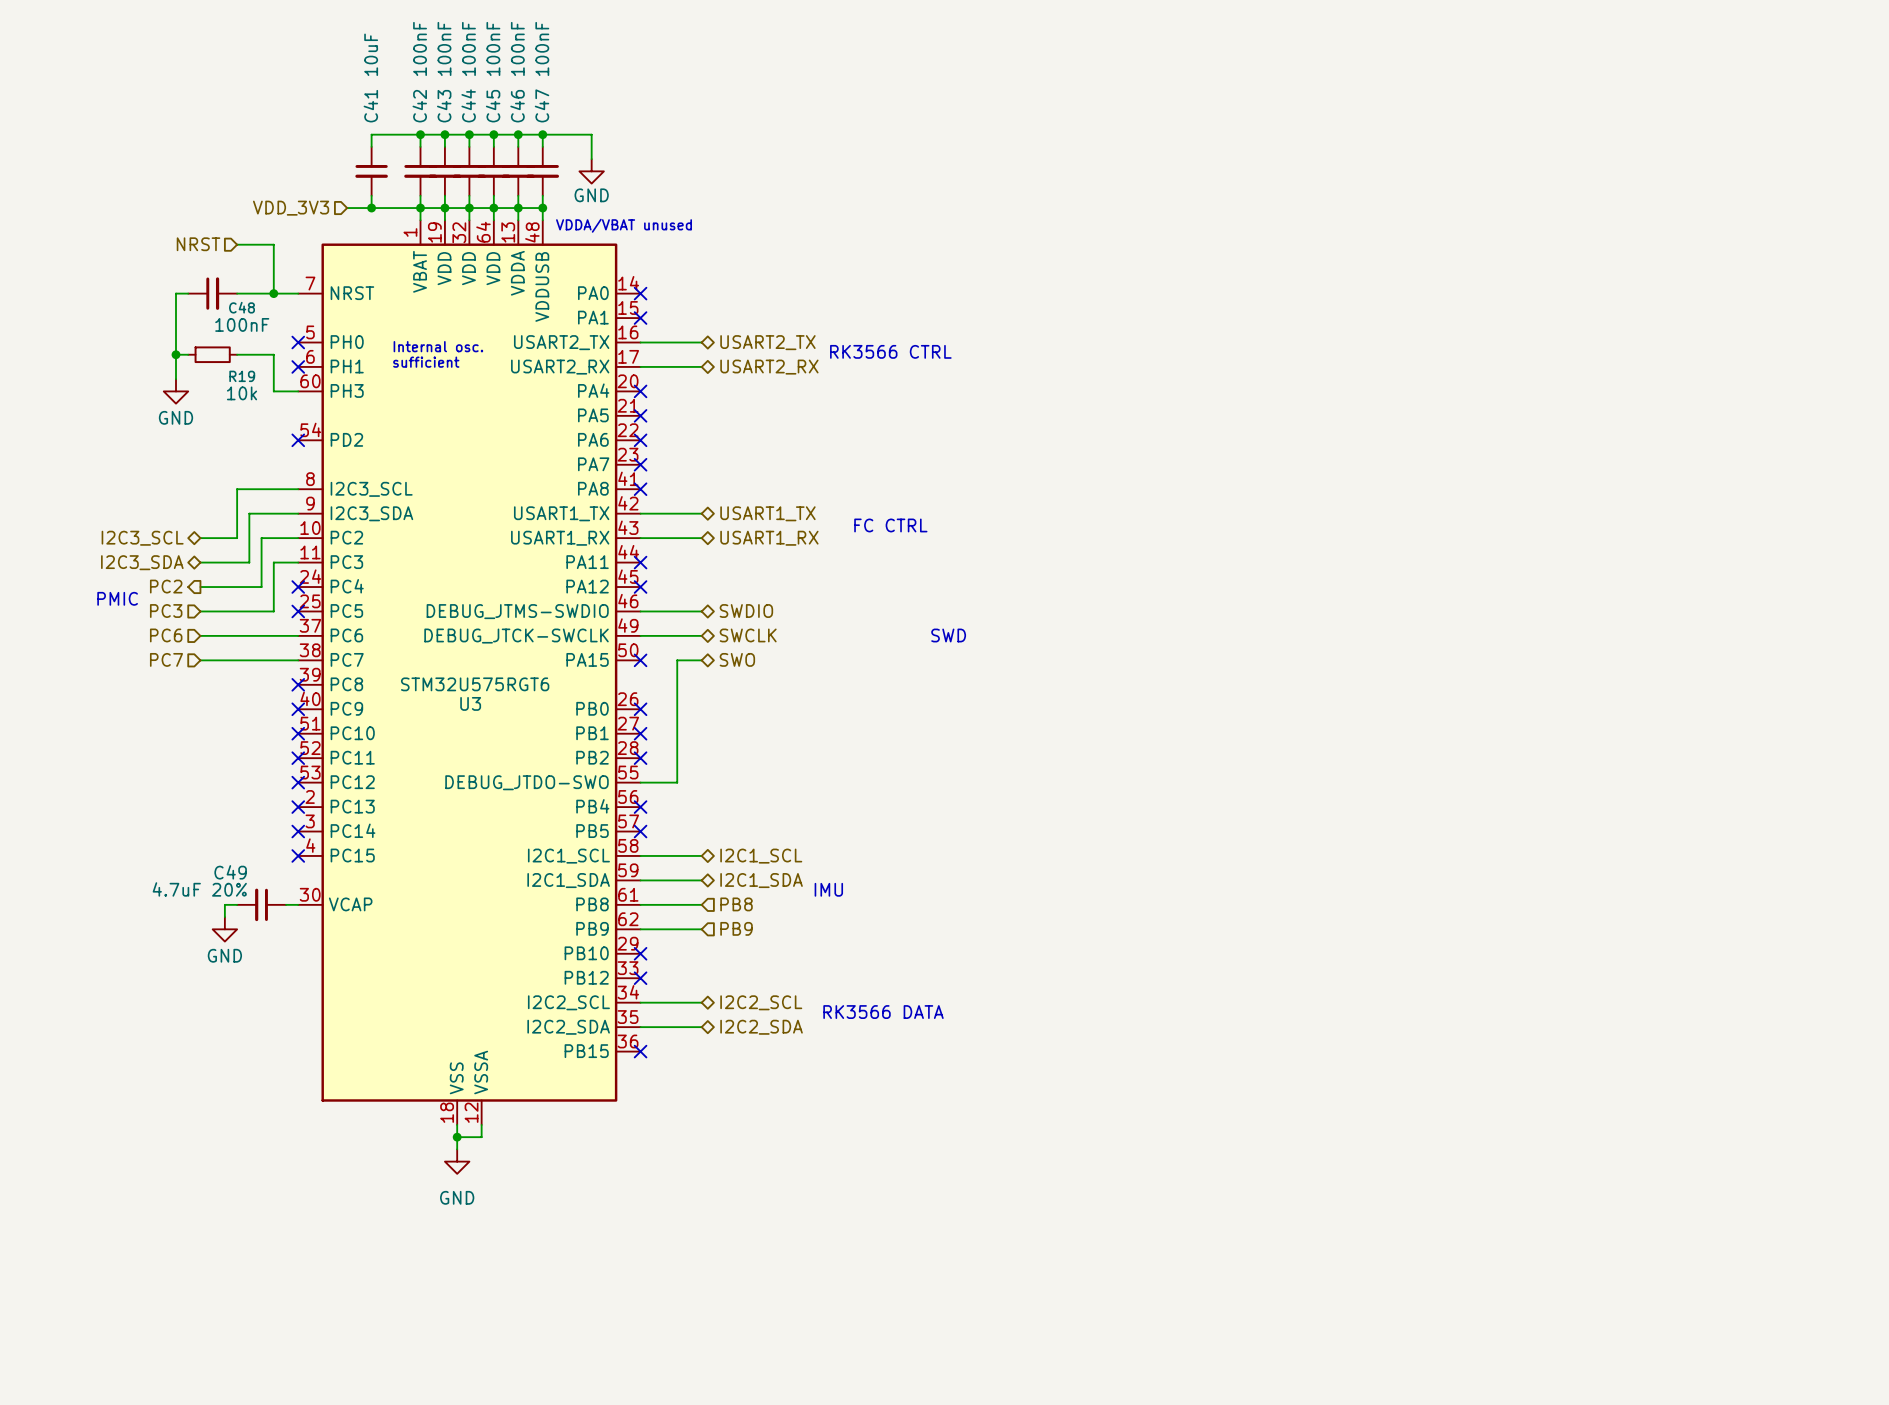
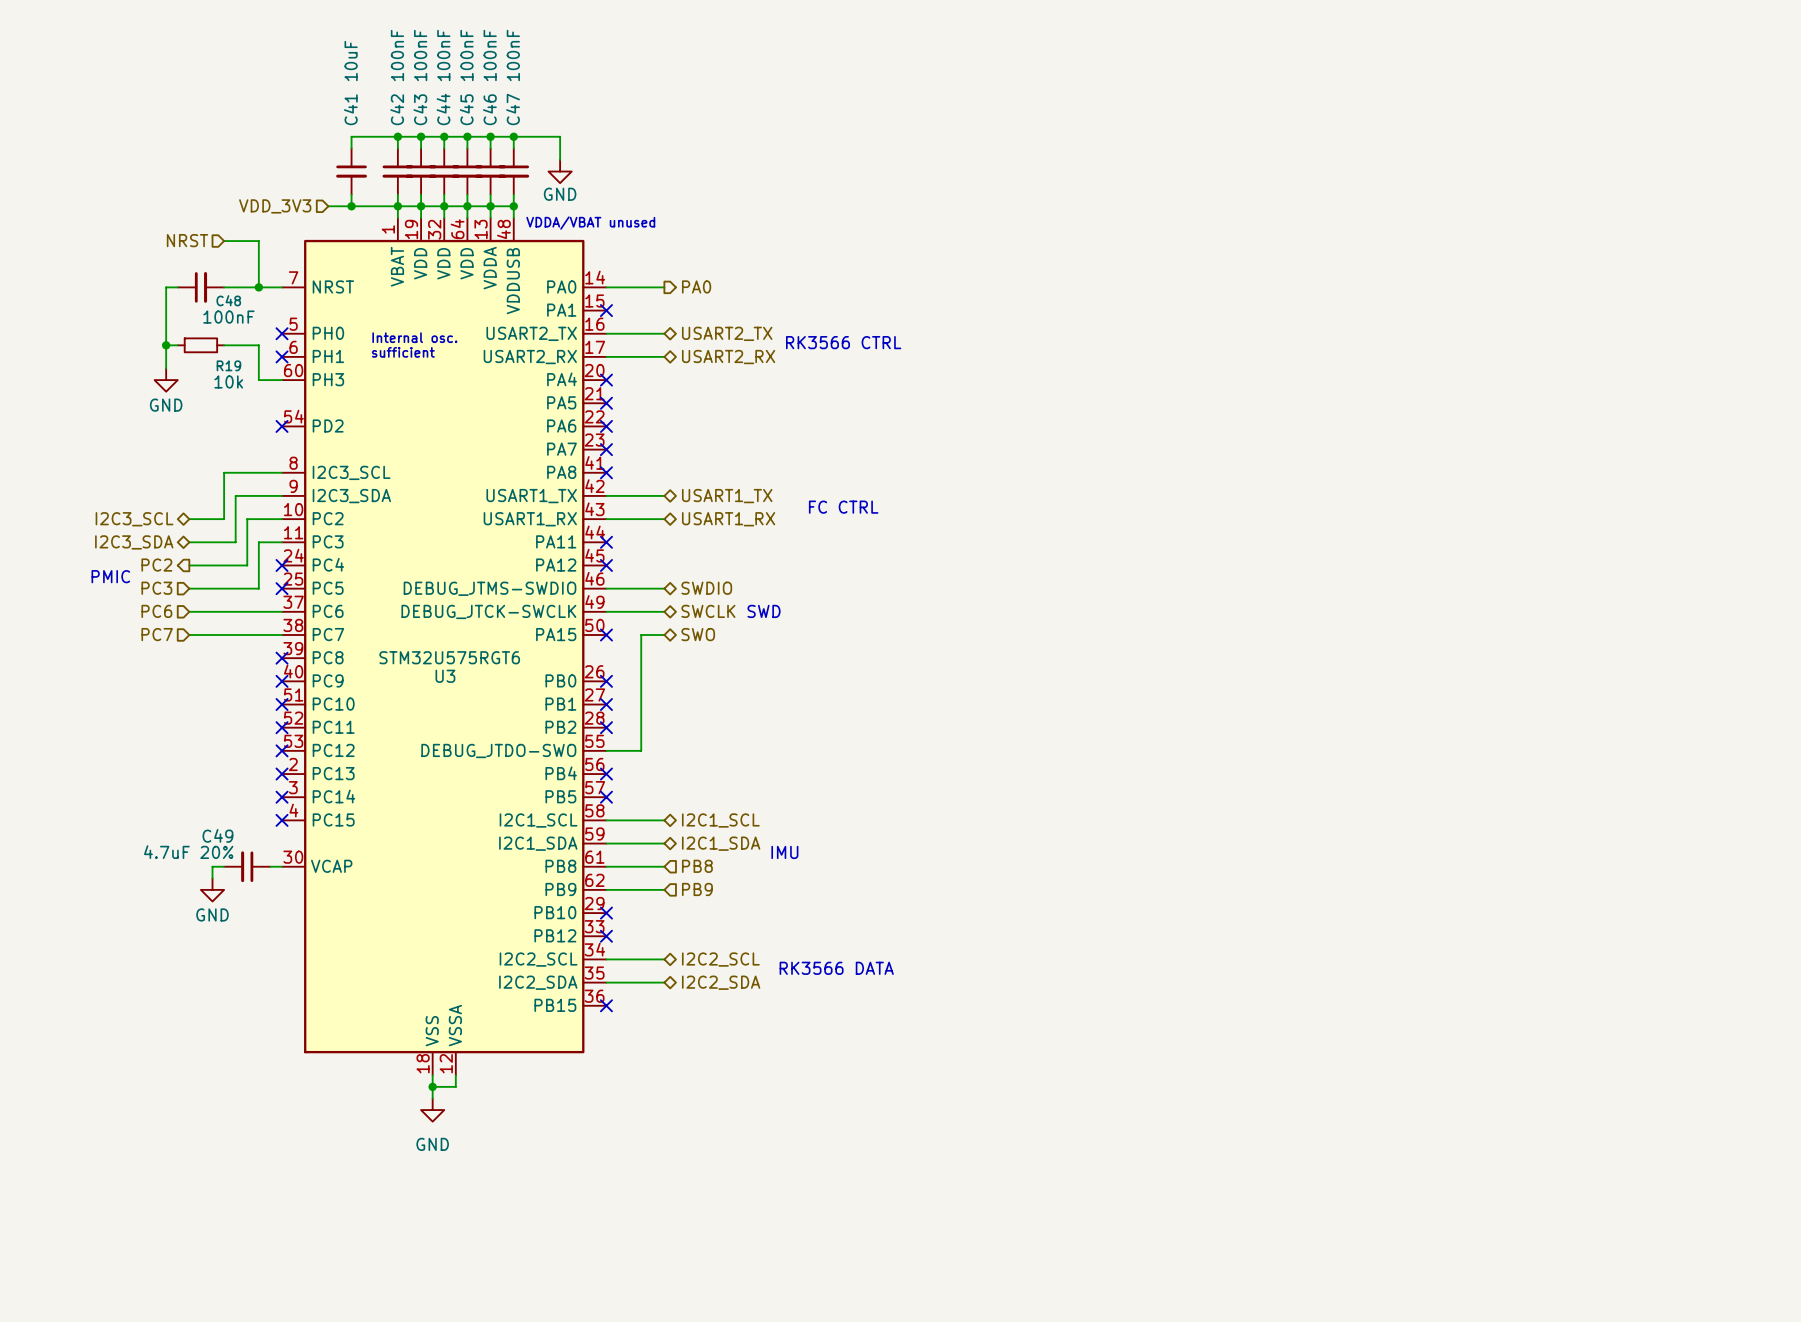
wire: none -> (606, 287) (664, 287)
no-connect mark: (640, 293) -> none
hierarchical label: none -> PA0 (696, 286)
text position: SWD (948, 635) -> SWD (764, 611)

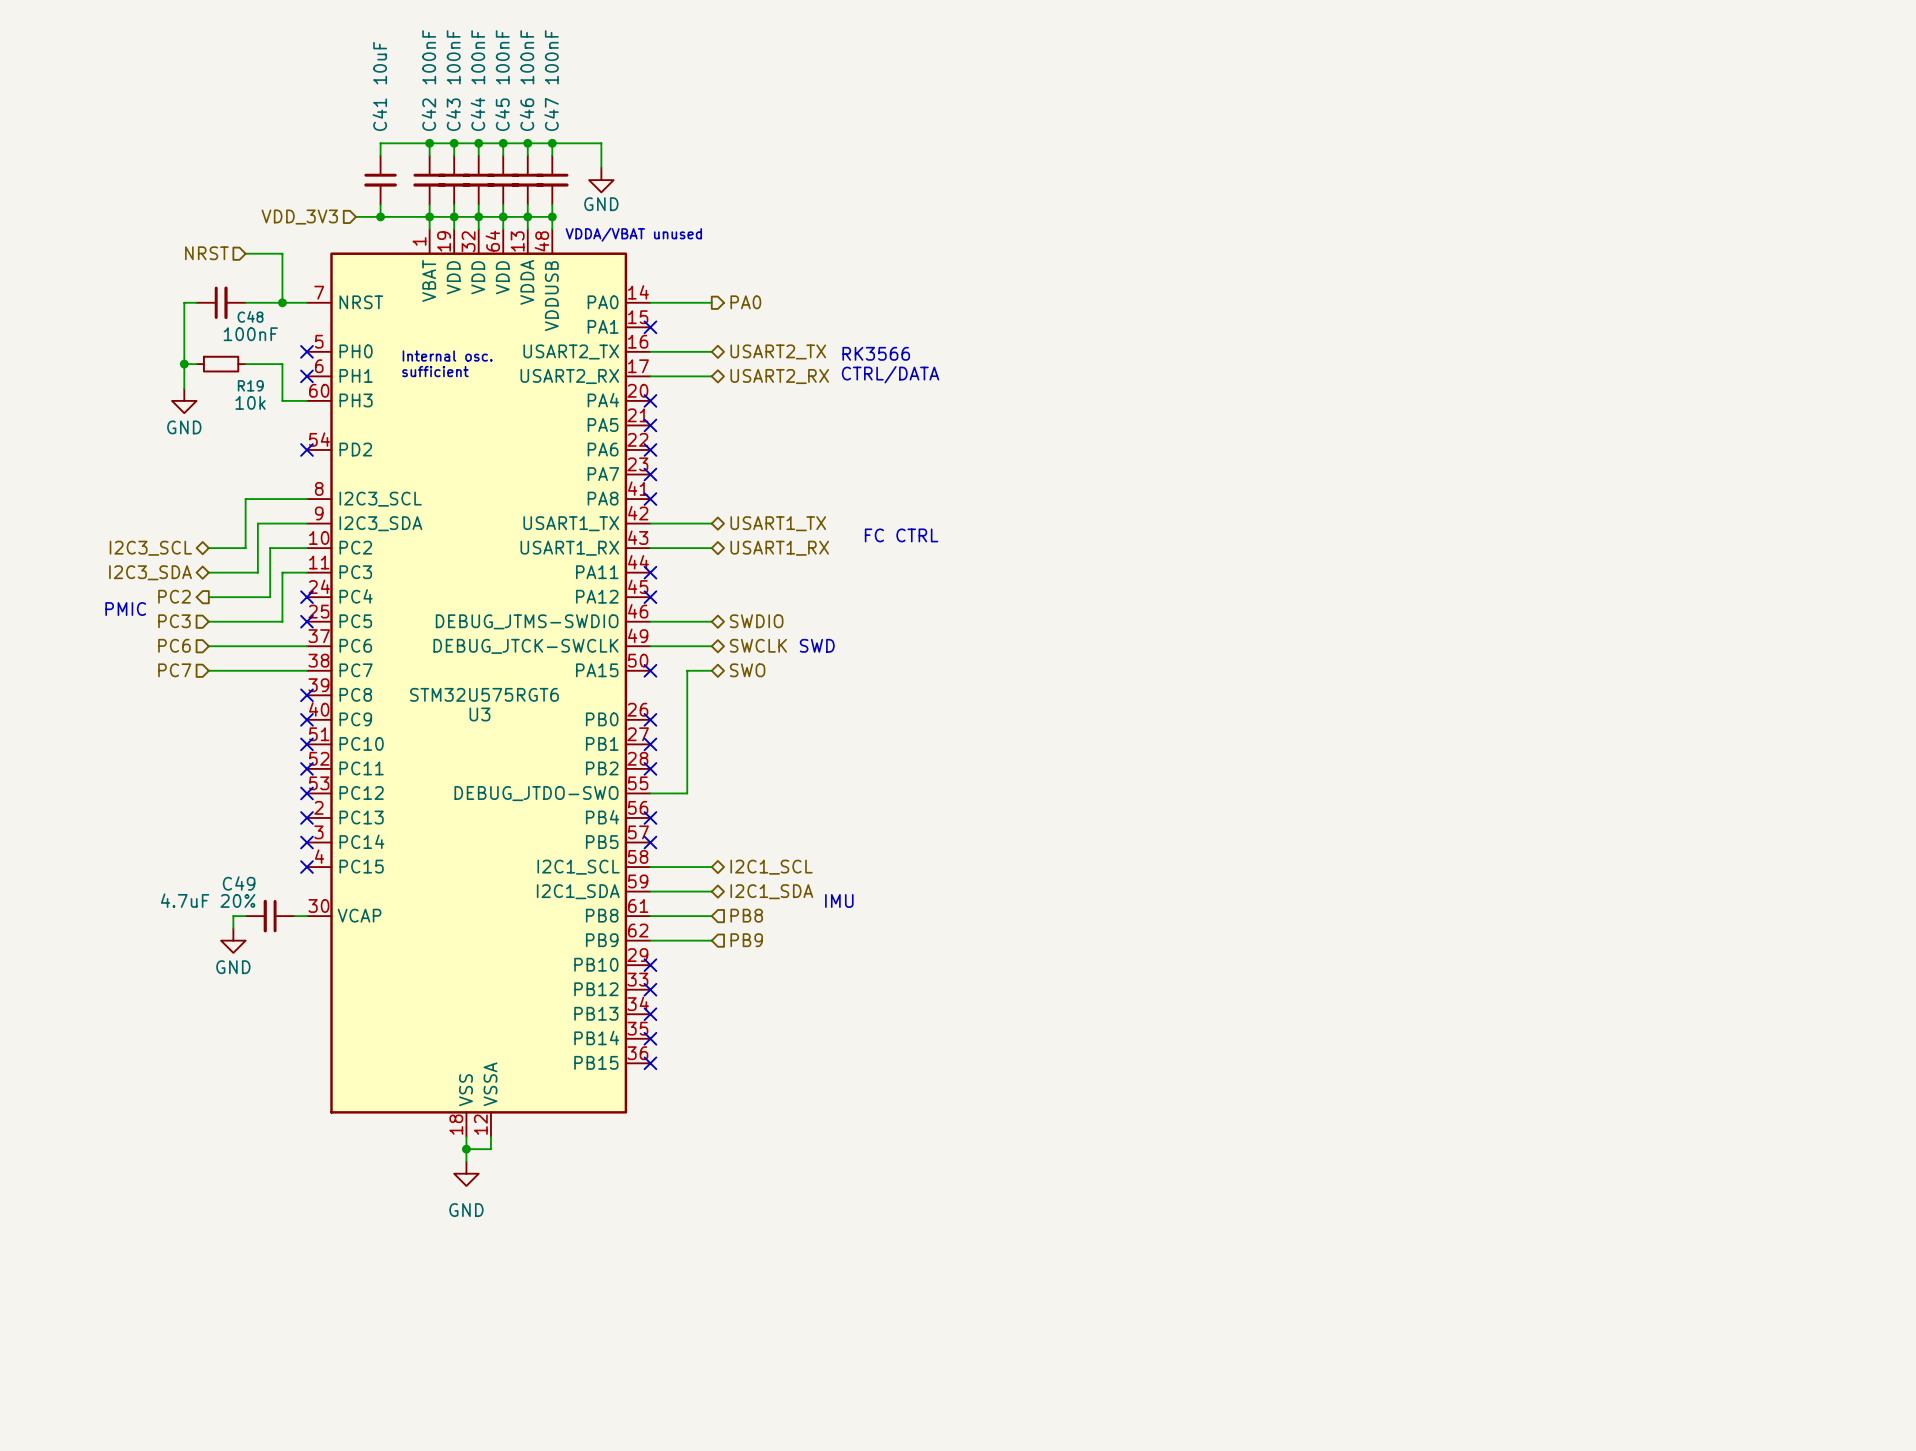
text: RK3566 CTRL (843, 342) -> RK3566 (876, 353)
text: none -> CTRL/DATA (890, 374)
U3 pin name: I2C2_SCL (538, 959) -> PB13 (596, 1013)
wire: (606, 959) (664, 959) -> none
no-connect mark: none -> (650, 1014)
hierarchical label: I2C2_SCL (720, 959) -> none
text: RK3566 DATA (836, 968) -> none
U3 pin name: I2C2_SDA (538, 982) -> PB14 (596, 1038)
wire: (606, 982) (664, 982) -> none
no-connect mark: none -> (650, 1038)
hierarchical label: I2C2_SDA (721, 982) -> none

